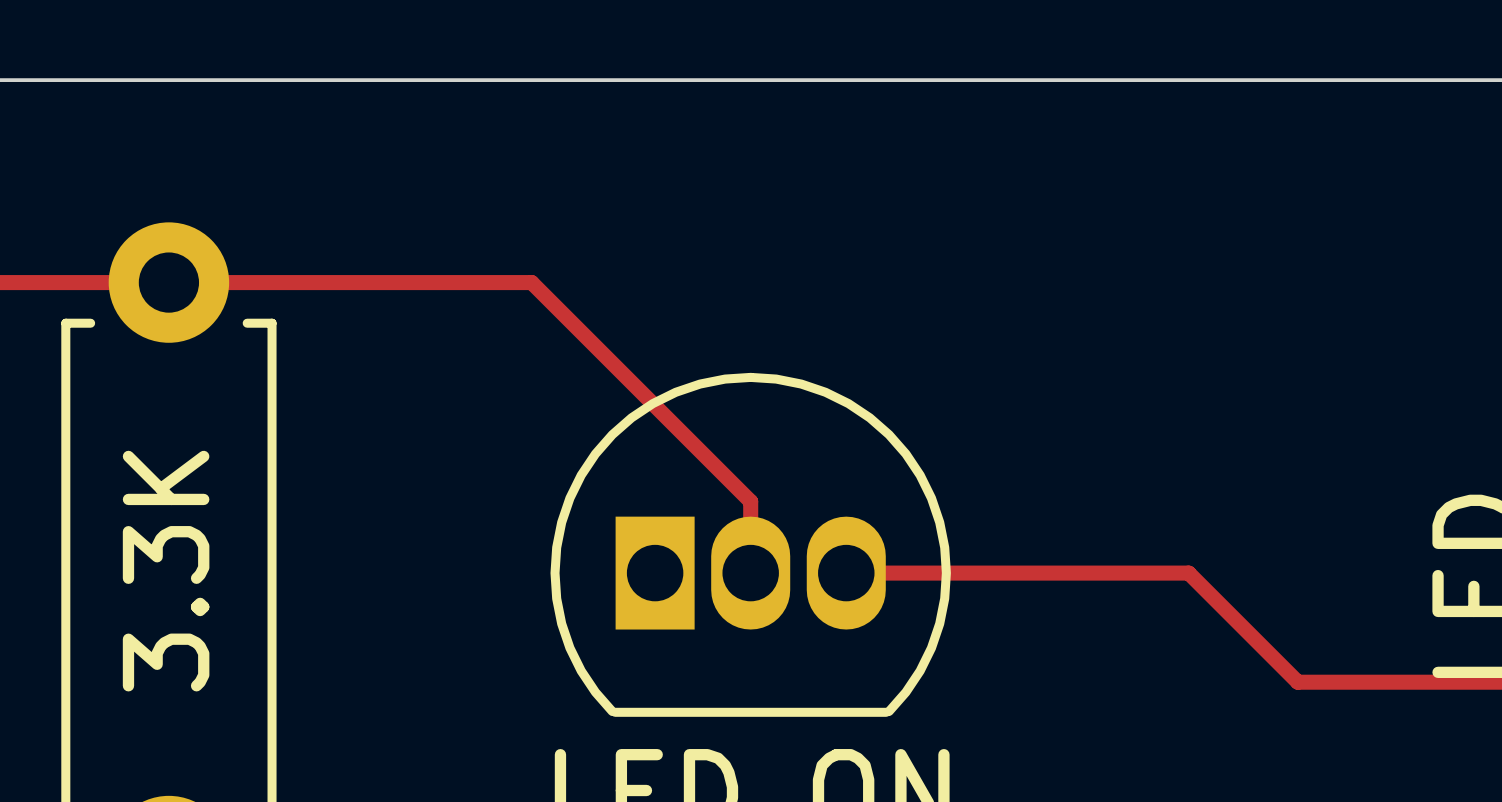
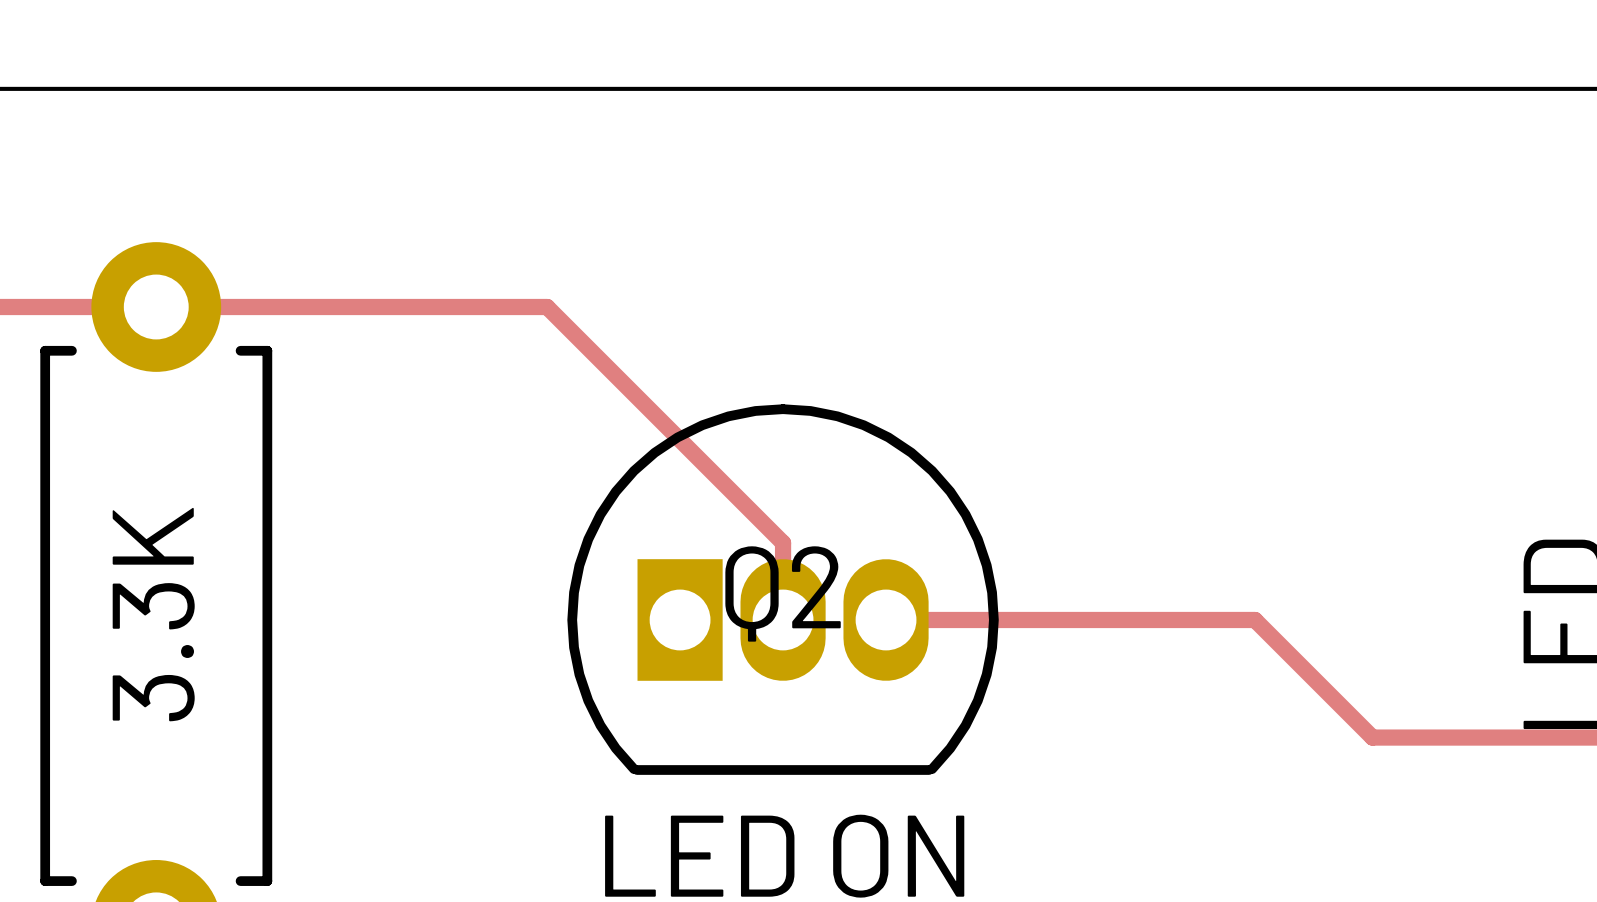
Q2 name: none -> Q2 (783, 593)

